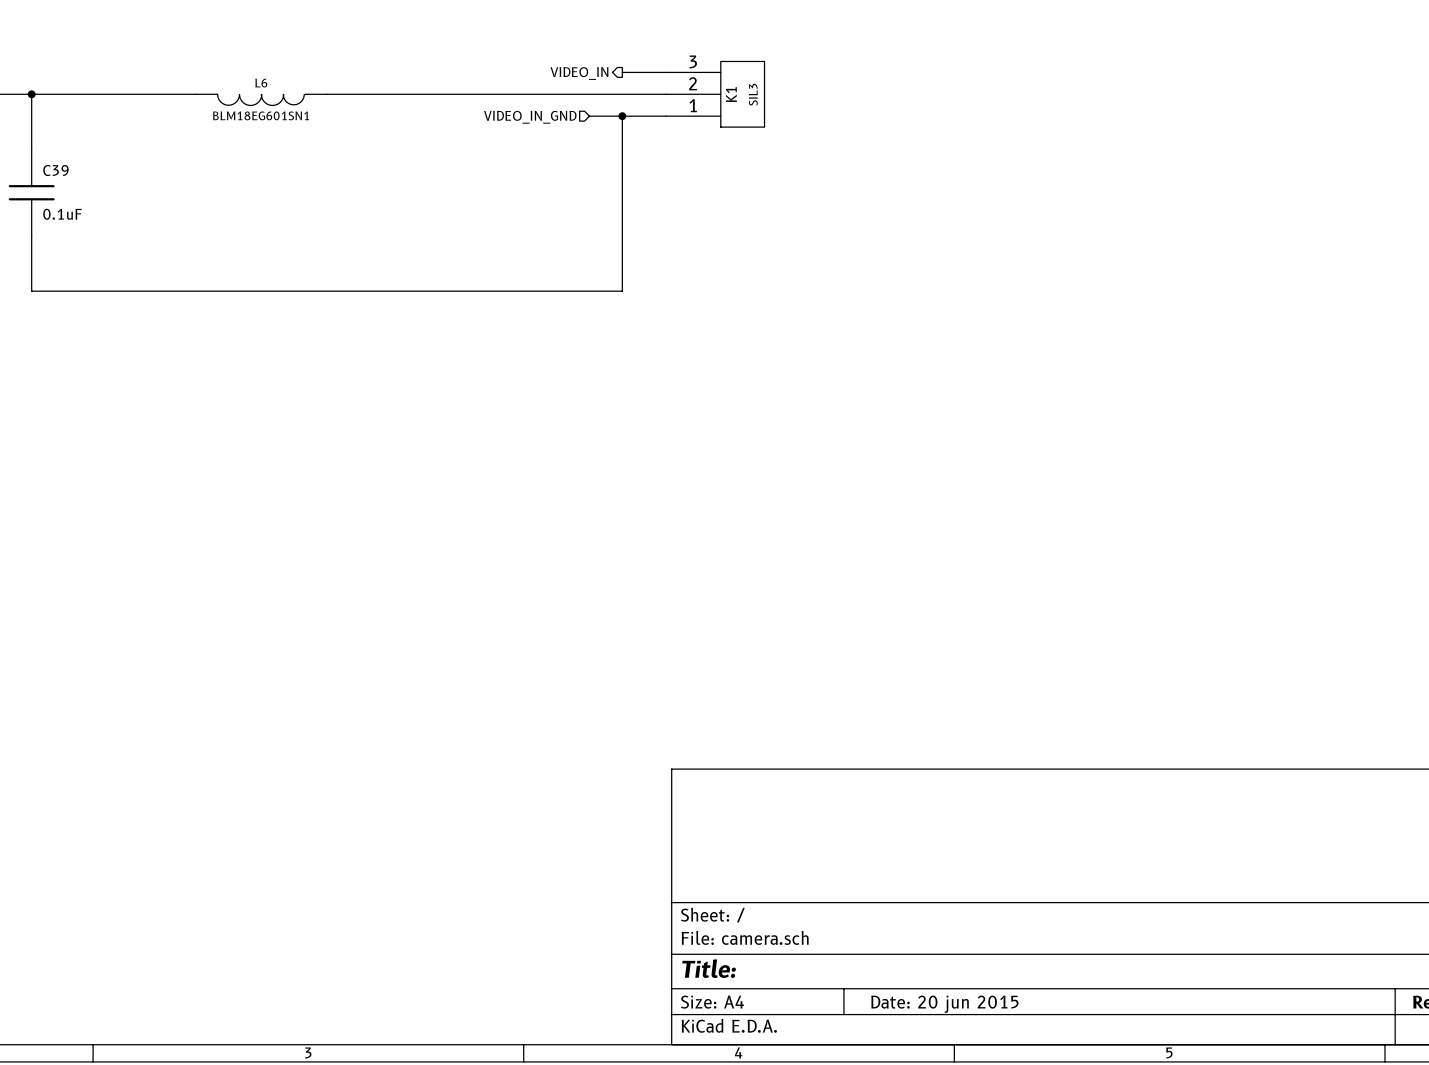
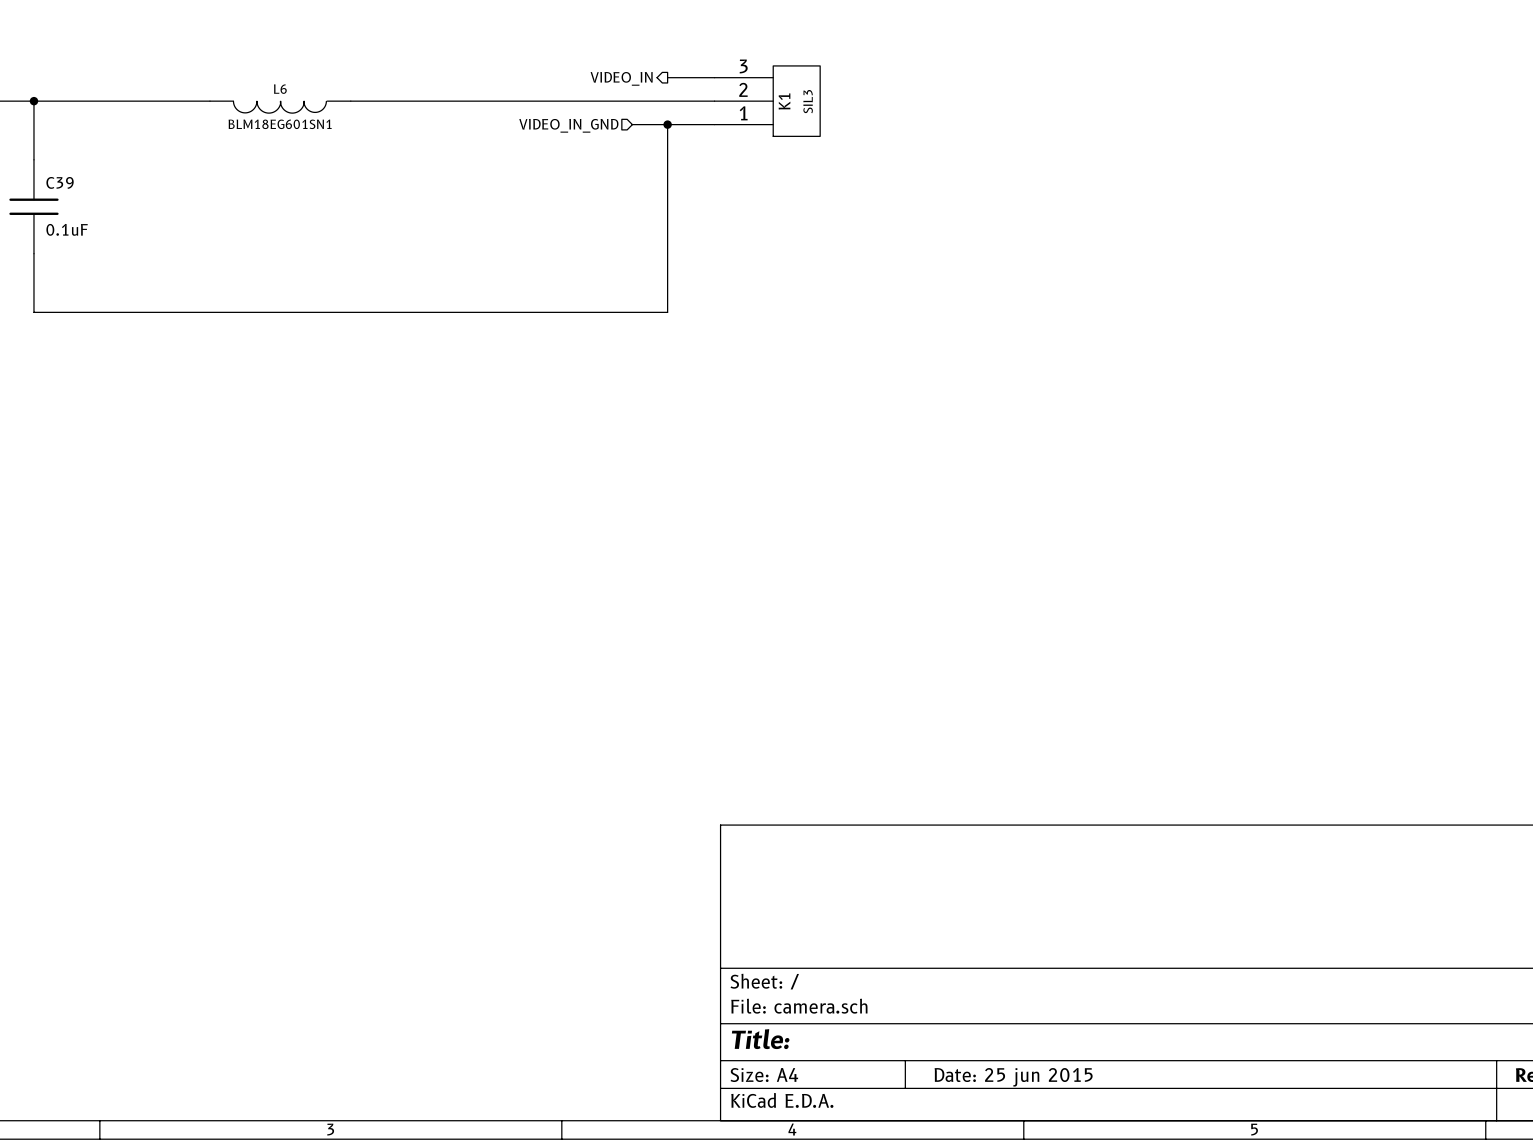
title block: Date: 20 jun 2015 (944, 1004) -> Date: 25 jun 2015 (1013, 1077)

